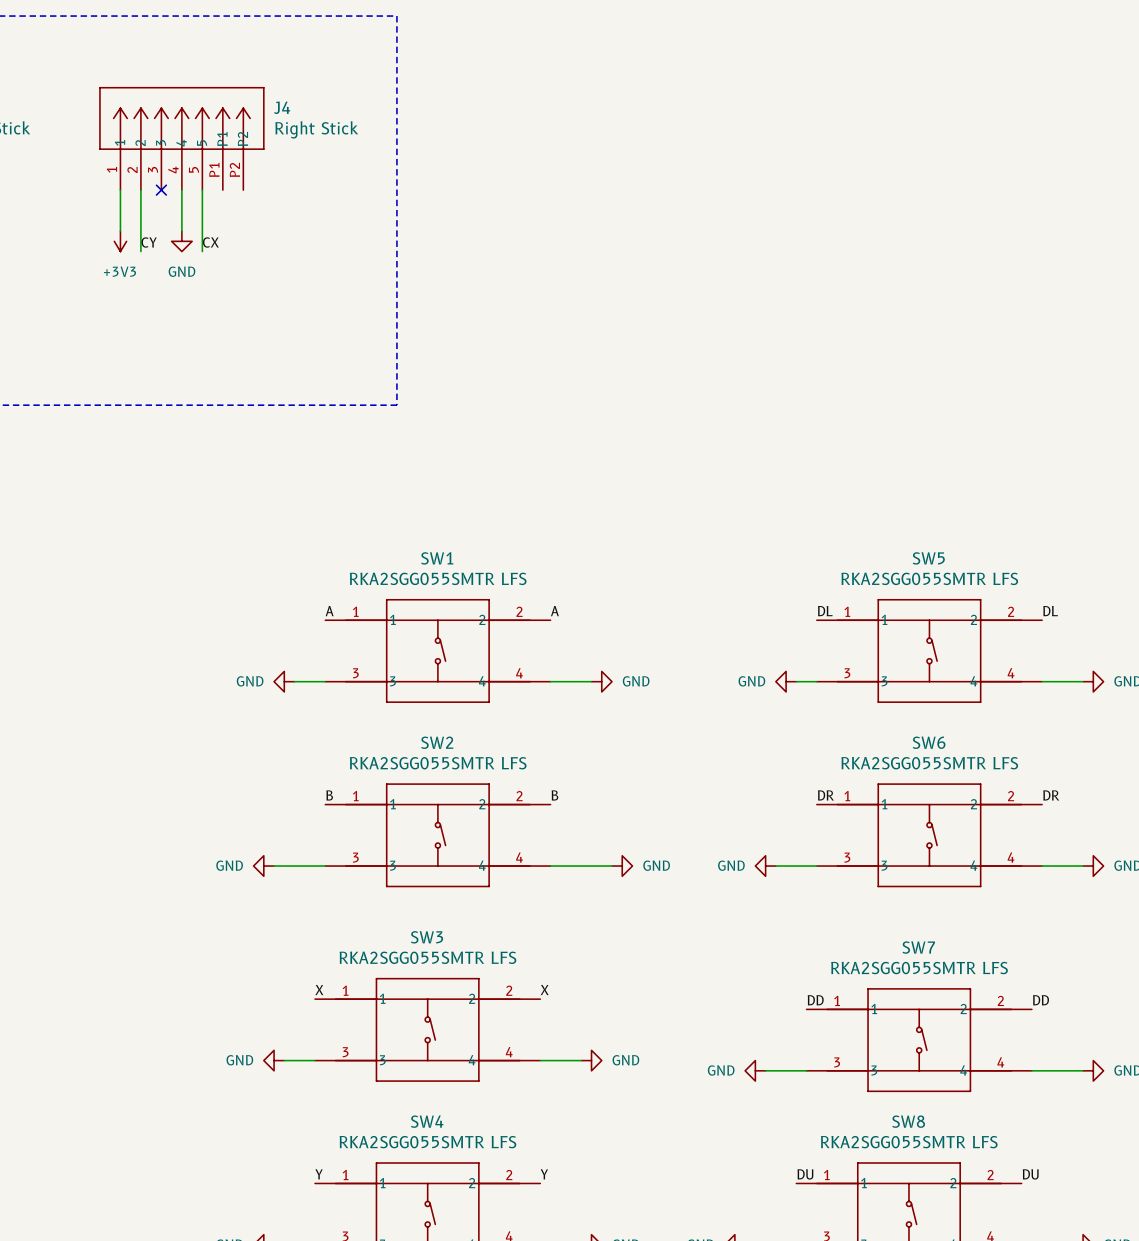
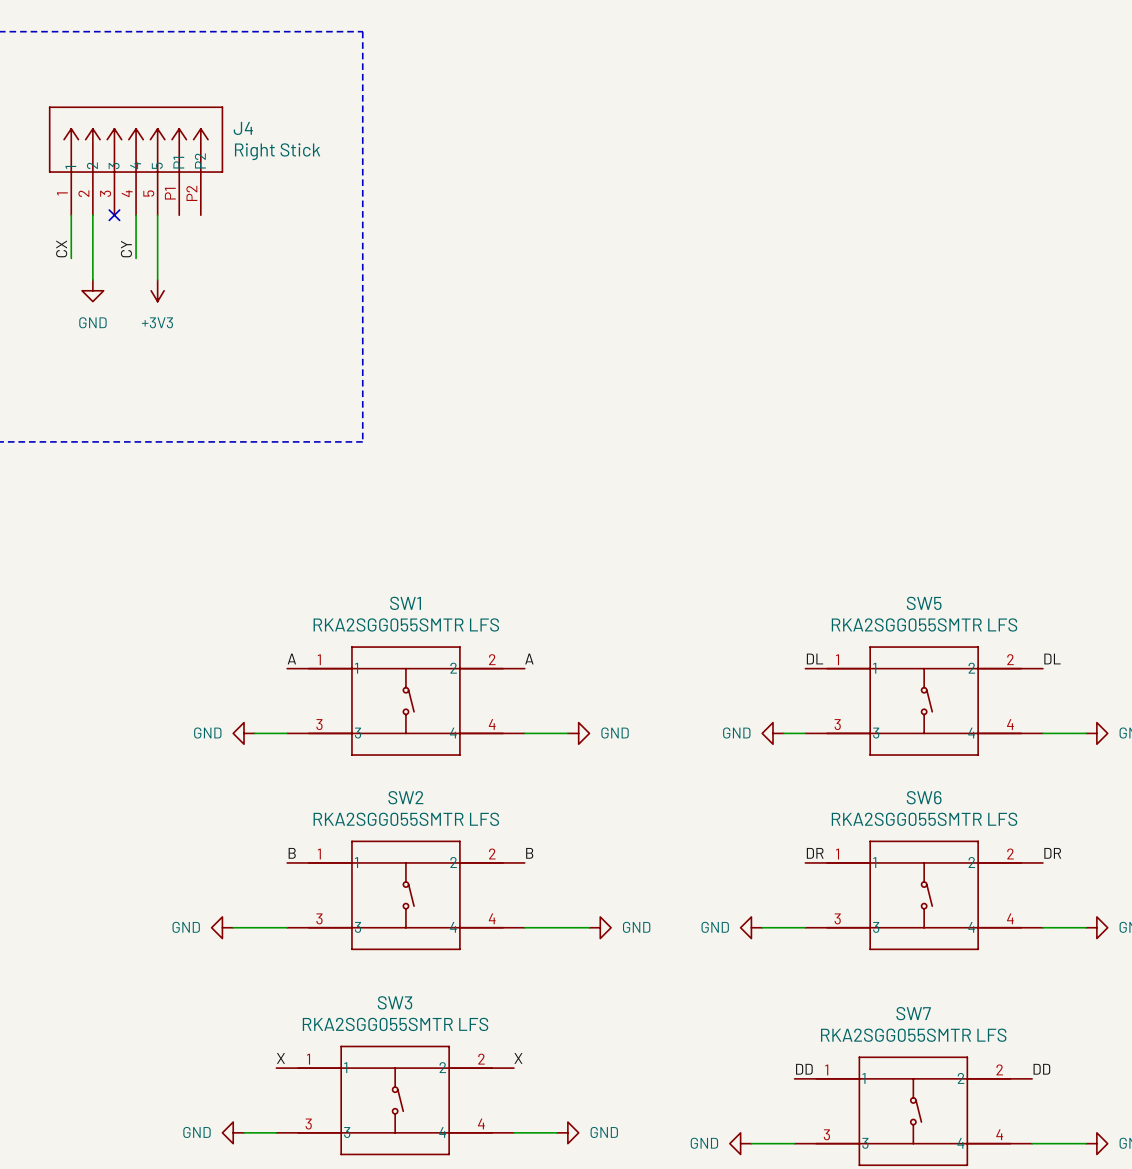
power symbol position: +3V3 (120, 241) -> +3V3 (157, 290)
power symbol position: GND (181, 241) -> GND (92, 290)
label rotation: 0° (149, 242) -> 90° counterclockwise (126, 249)
label position: CY (149, 242) -> CY (126, 249)
label rotation: 0° (210, 242) -> 90° counterclockwise (61, 248)
label position: CX (210, 242) -> CX (61, 248)

